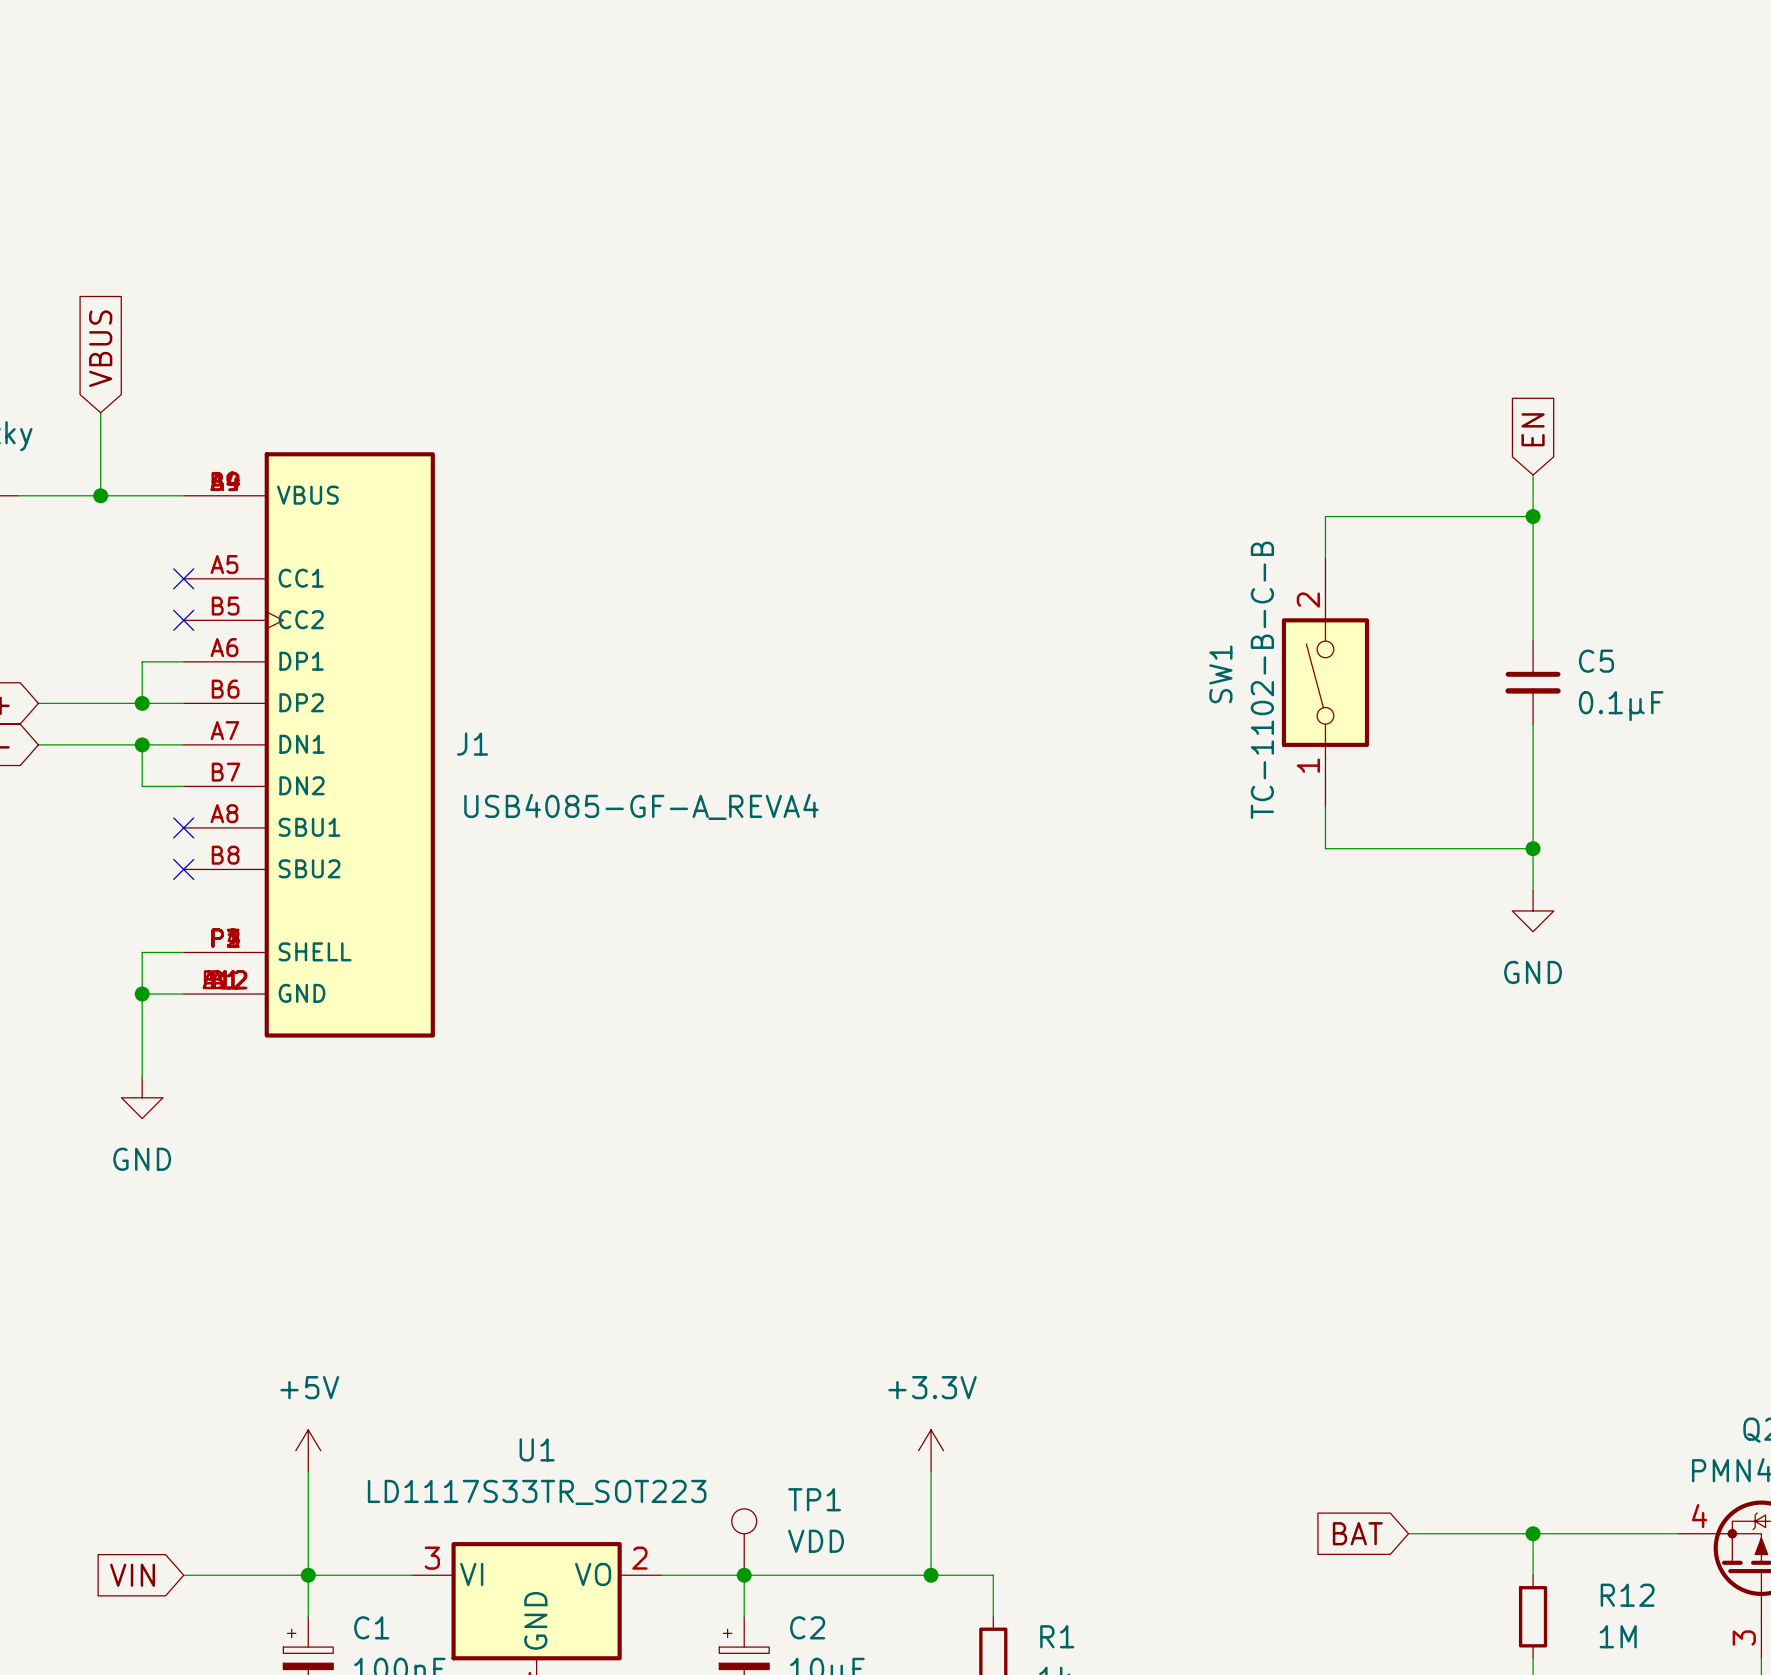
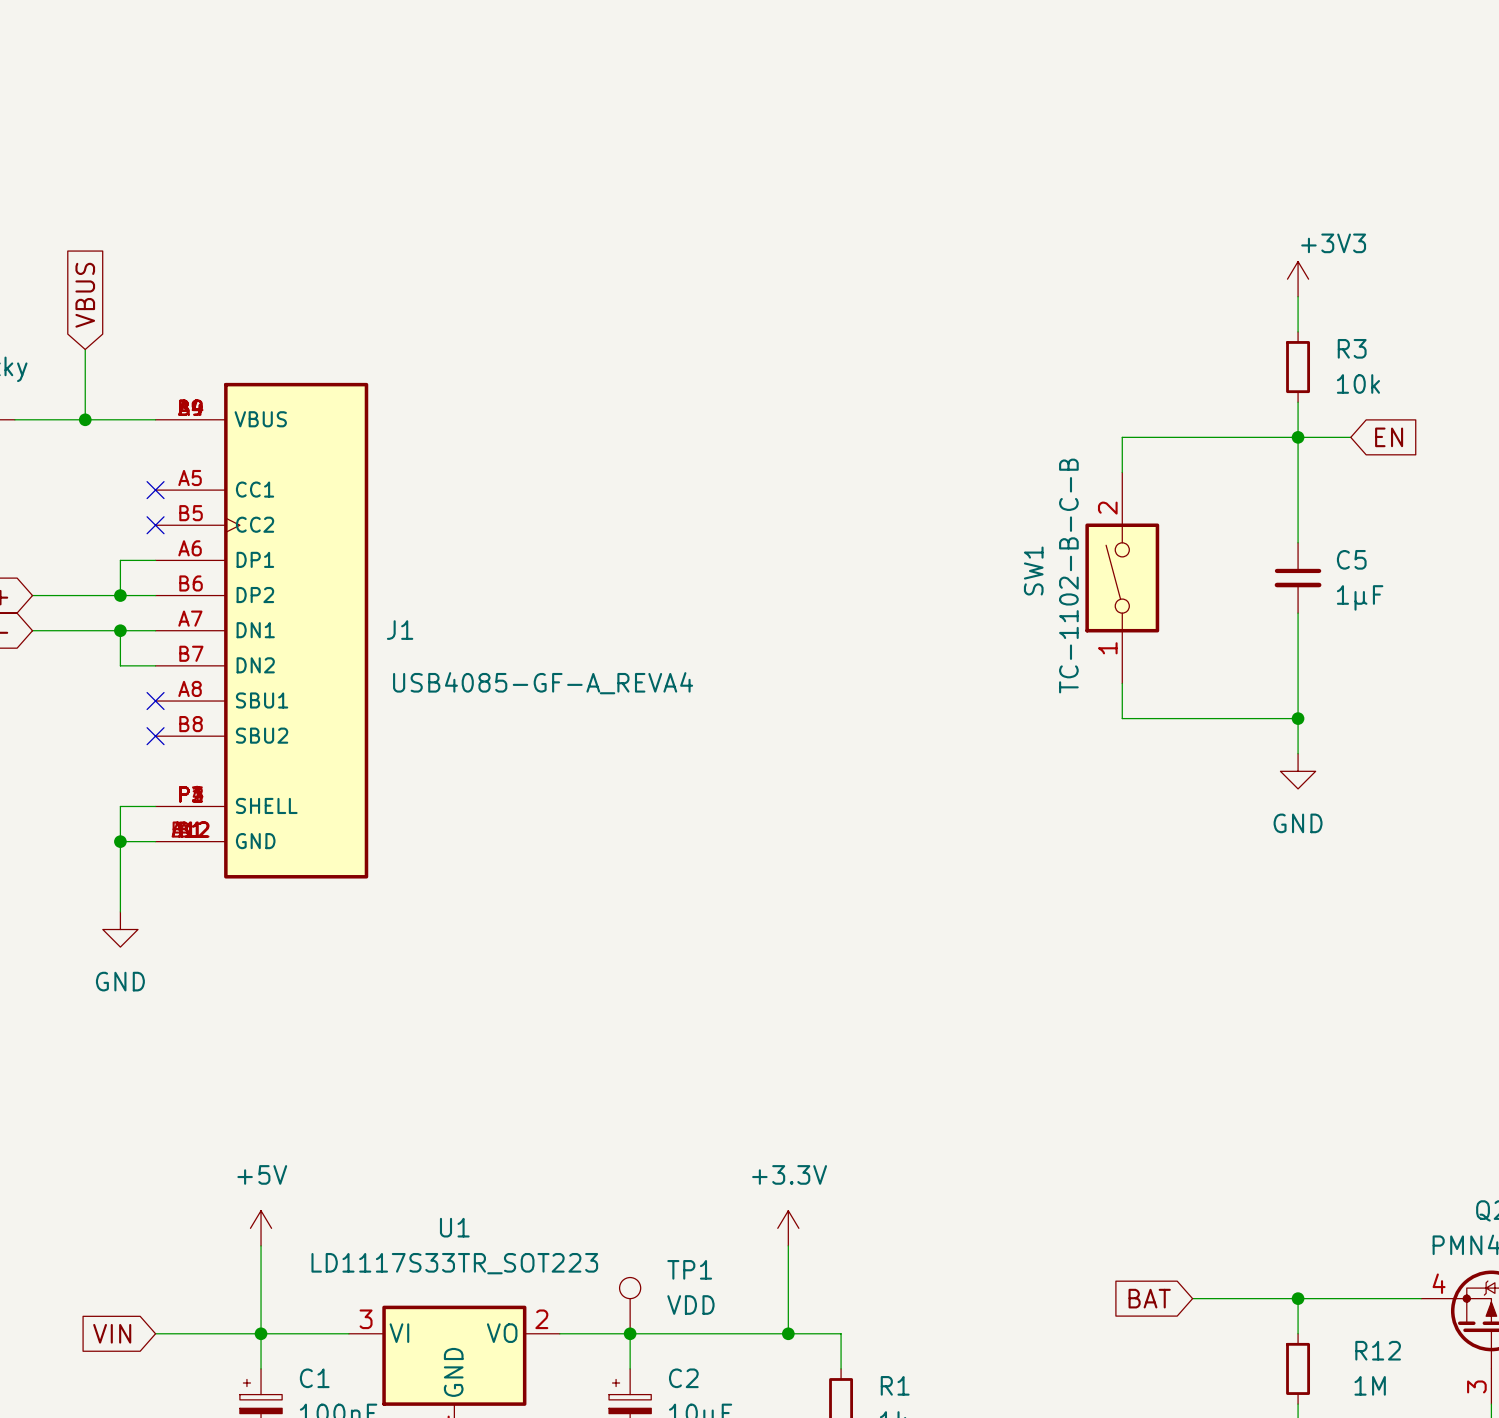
power symbol: none -> +3V3 (1298, 279)
wire: none -> (1298, 296) (1298, 331)
global label rotation: 0° (1533, 429) -> 90° clockwise (1389, 437)
global label position: EN (1533, 429) -> EN (1389, 437)
R3: none -> 10k (1298, 367)
wire: none -> (1298, 437) (1350, 437)
C5 value: 0.1µF (1621, 706) -> 1µF (1360, 597)

